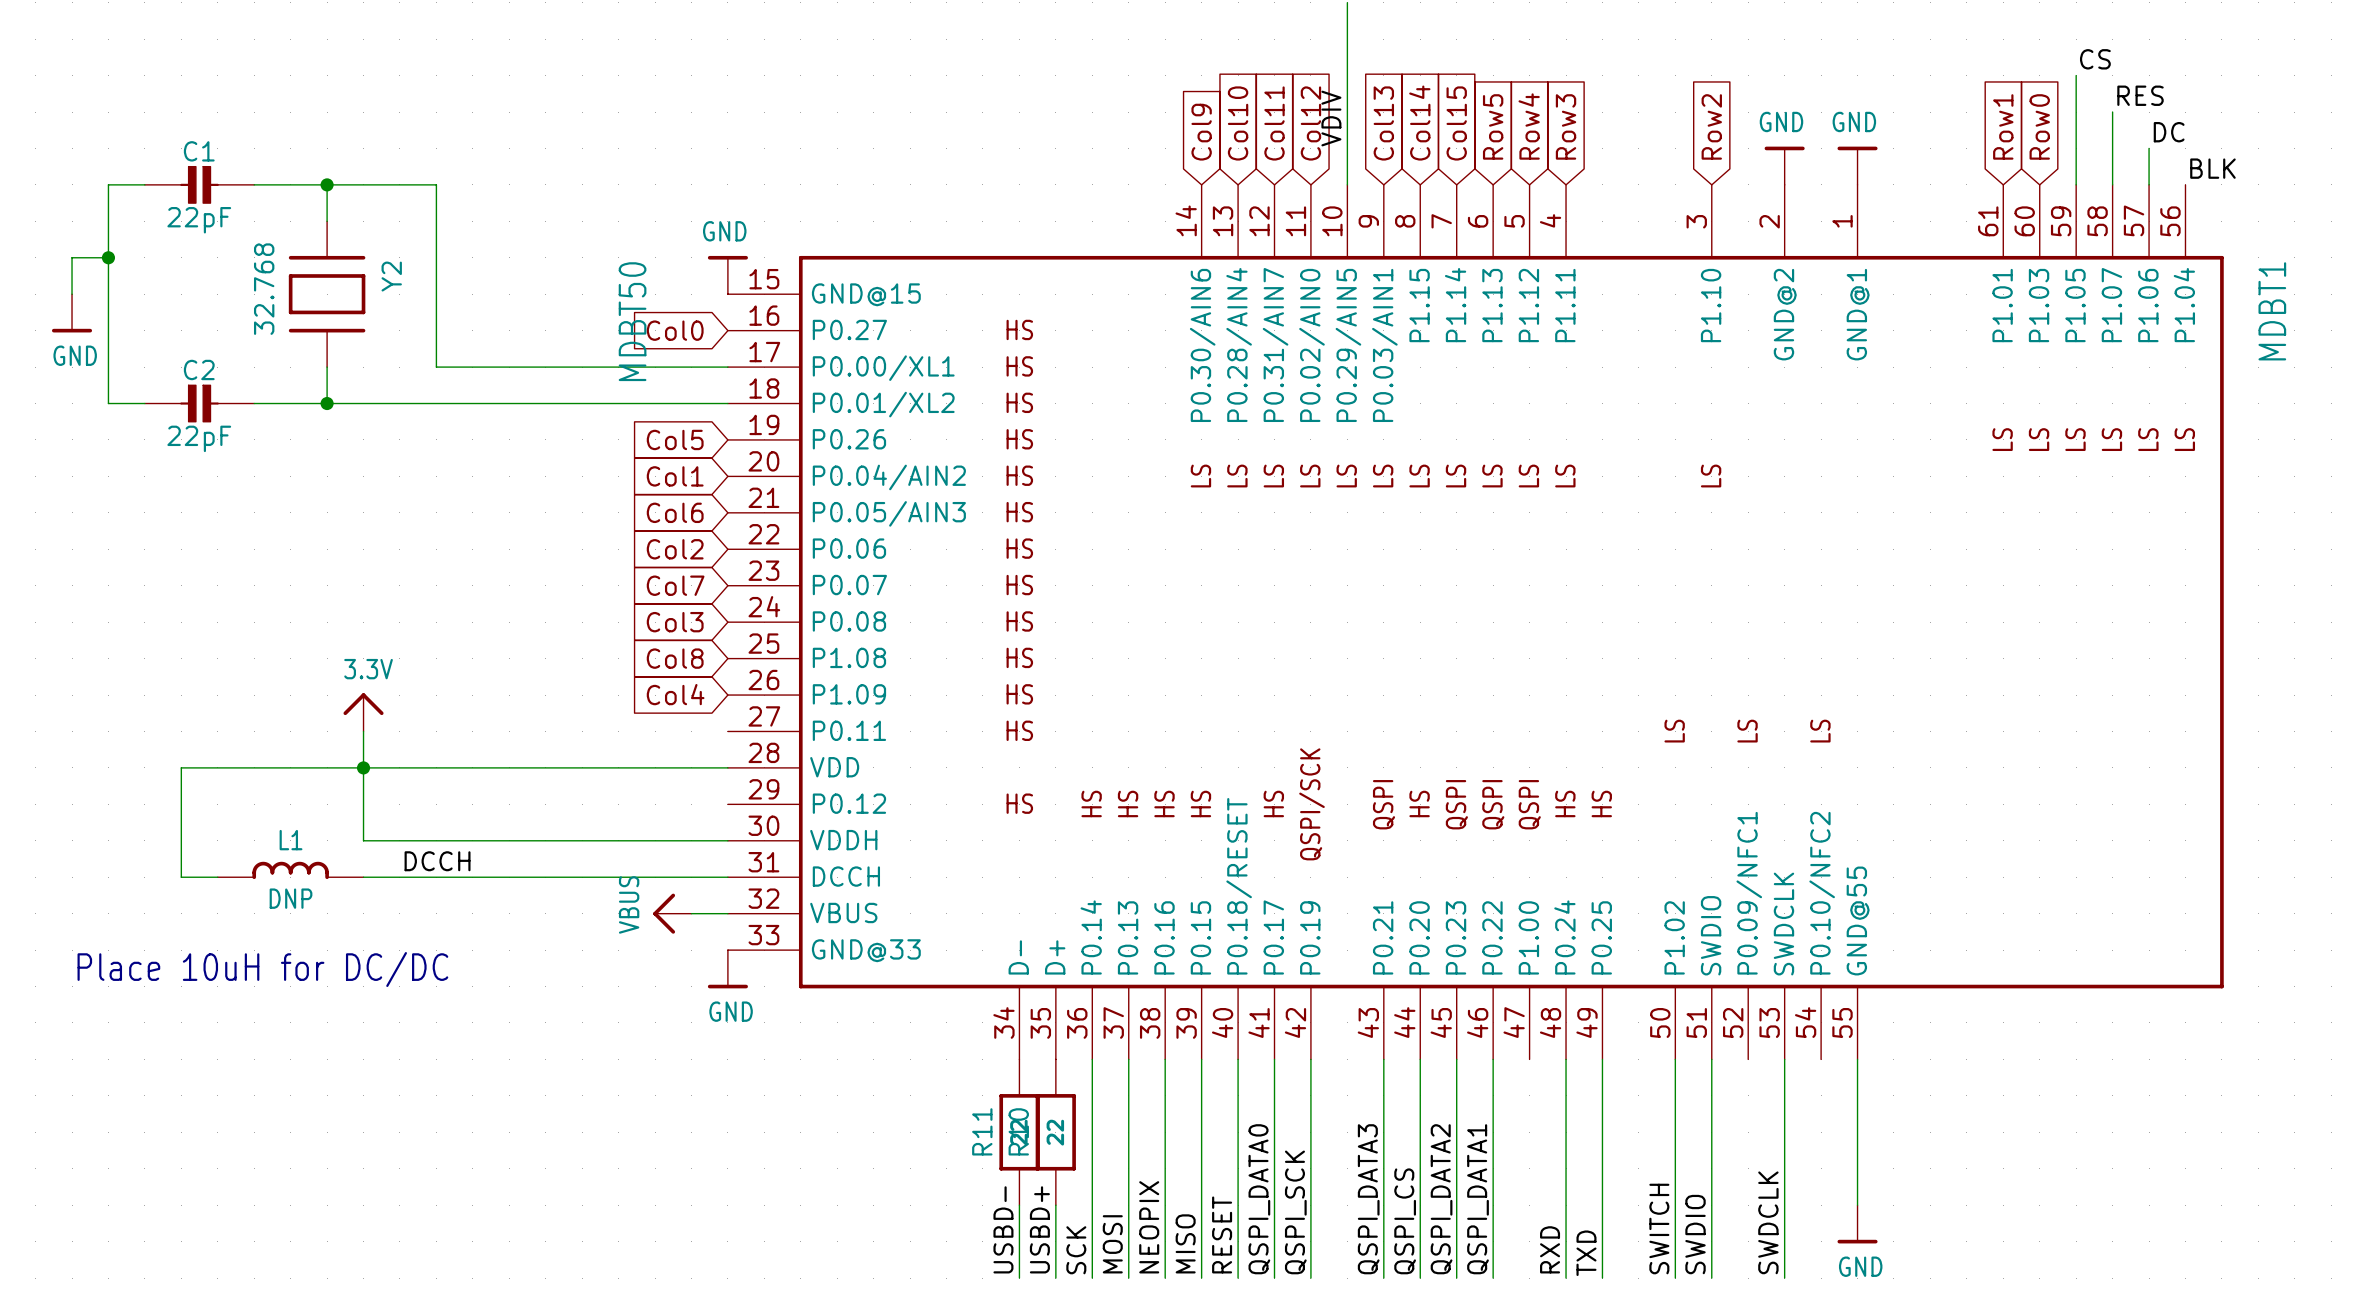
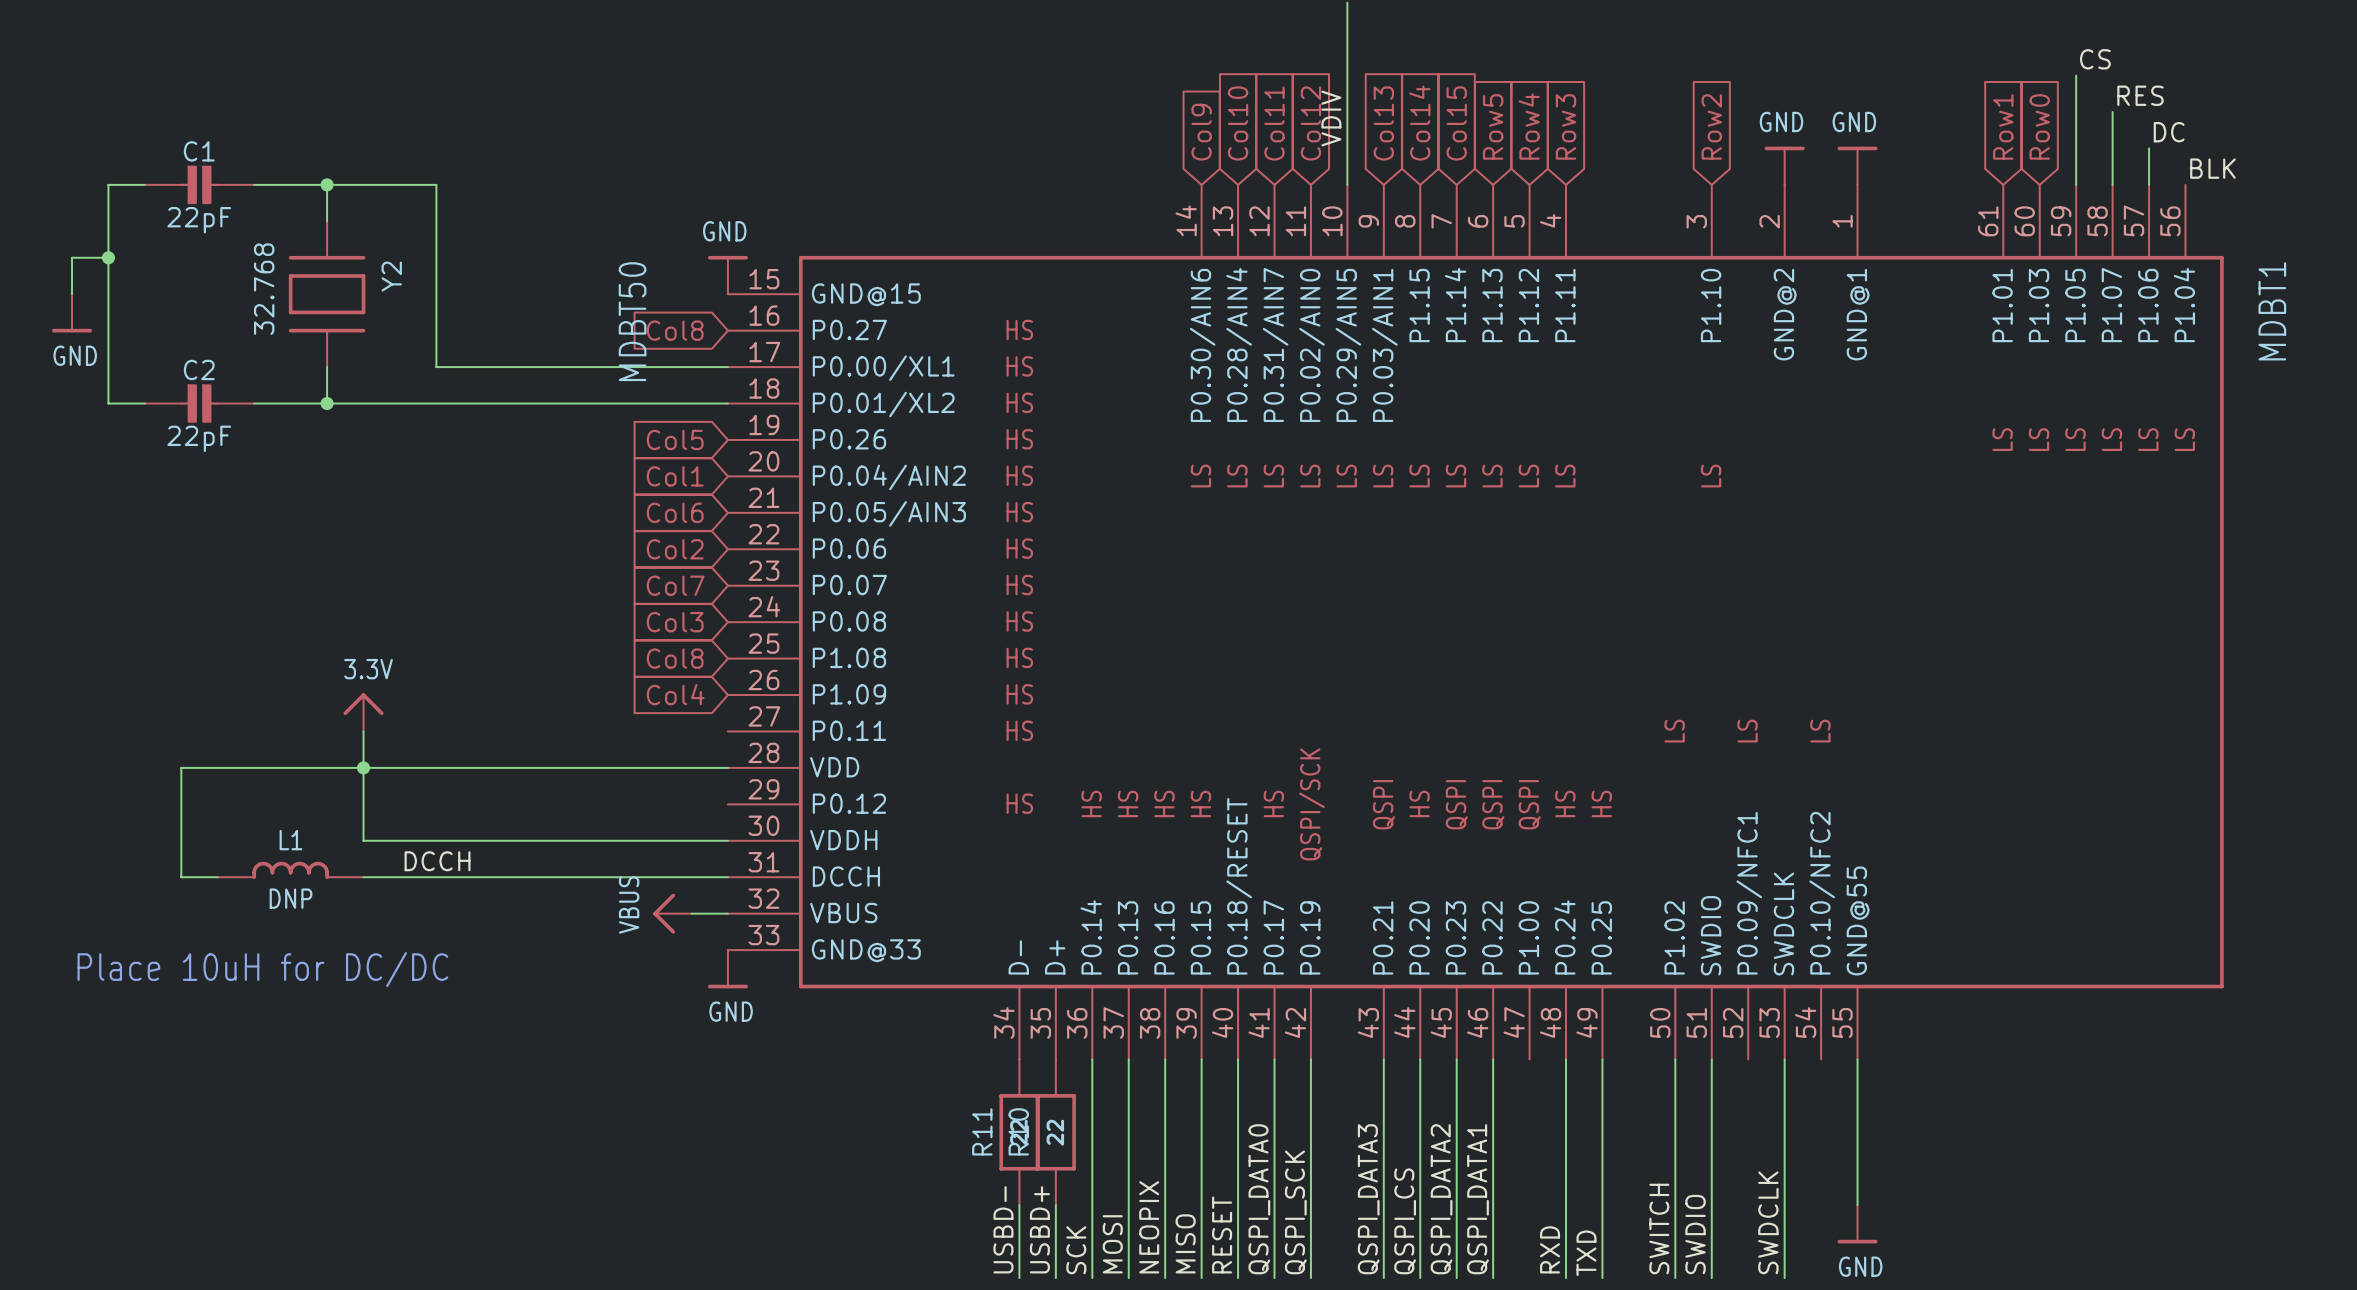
global label: Col0 (675, 330) -> Col8 (675, 330)

